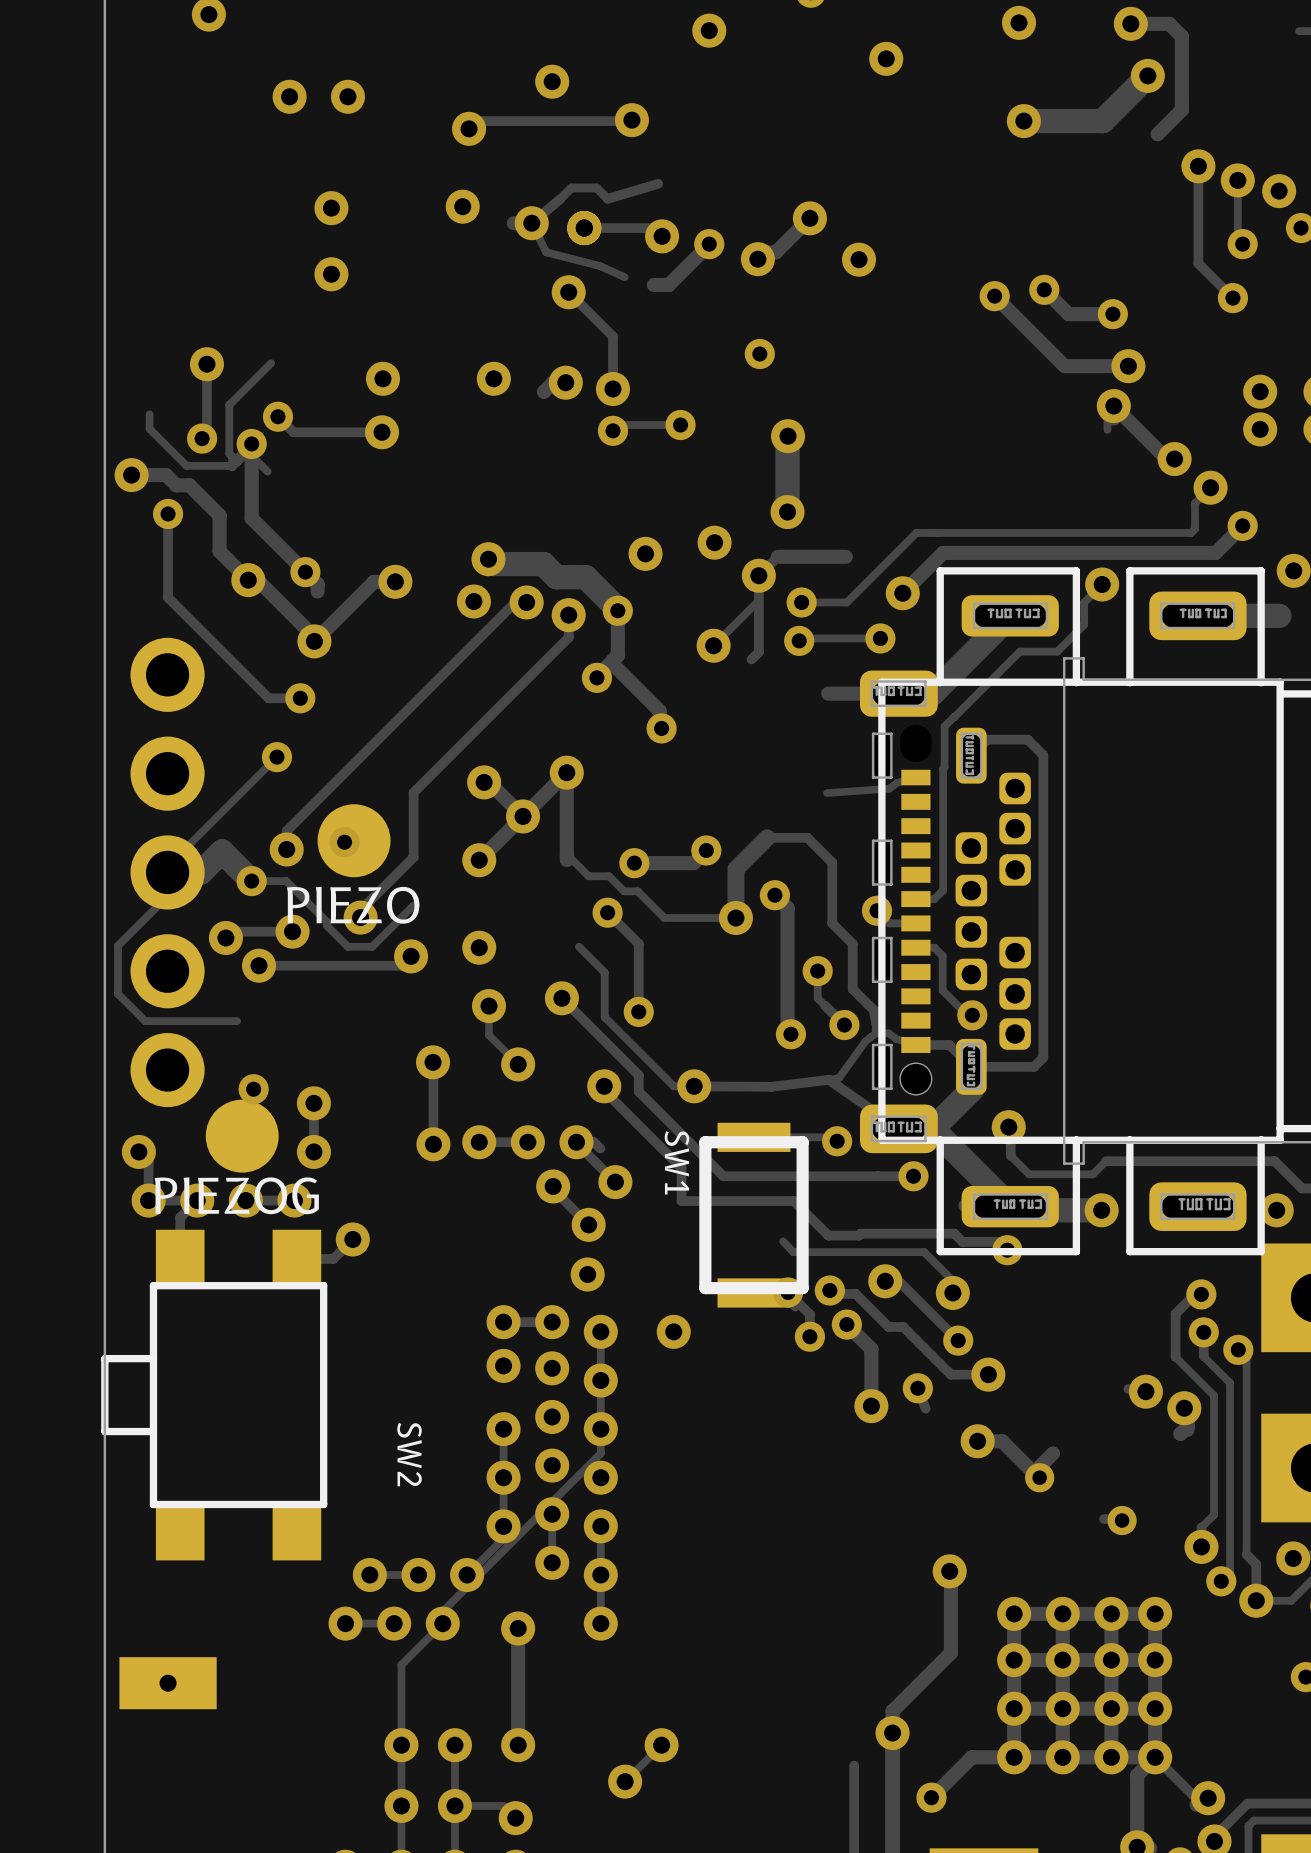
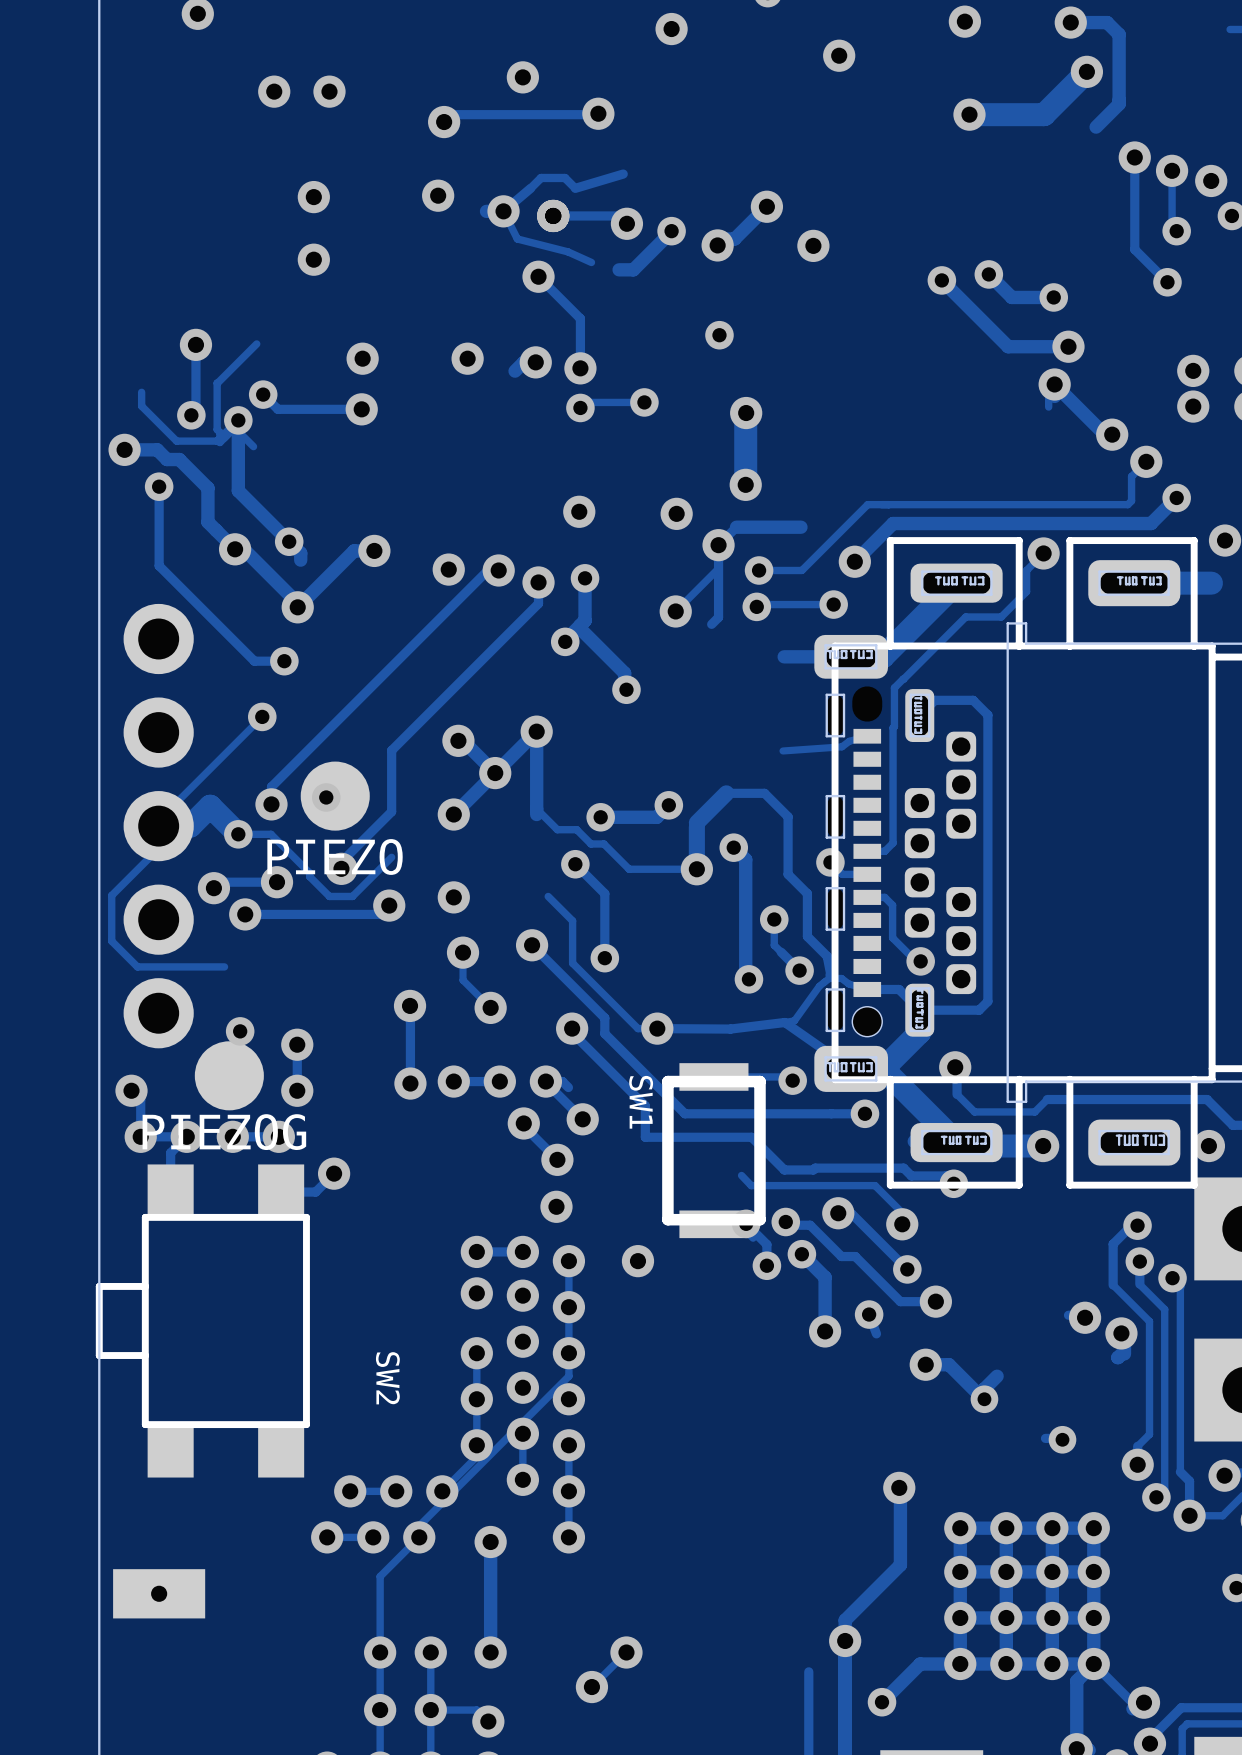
via position: (645, 553) -> (579, 511)
track: (488, 559) (493, 564) (543, 564) (556, 577) (585, 577) (617, 610) -> none
via: (488, 559) -> none

